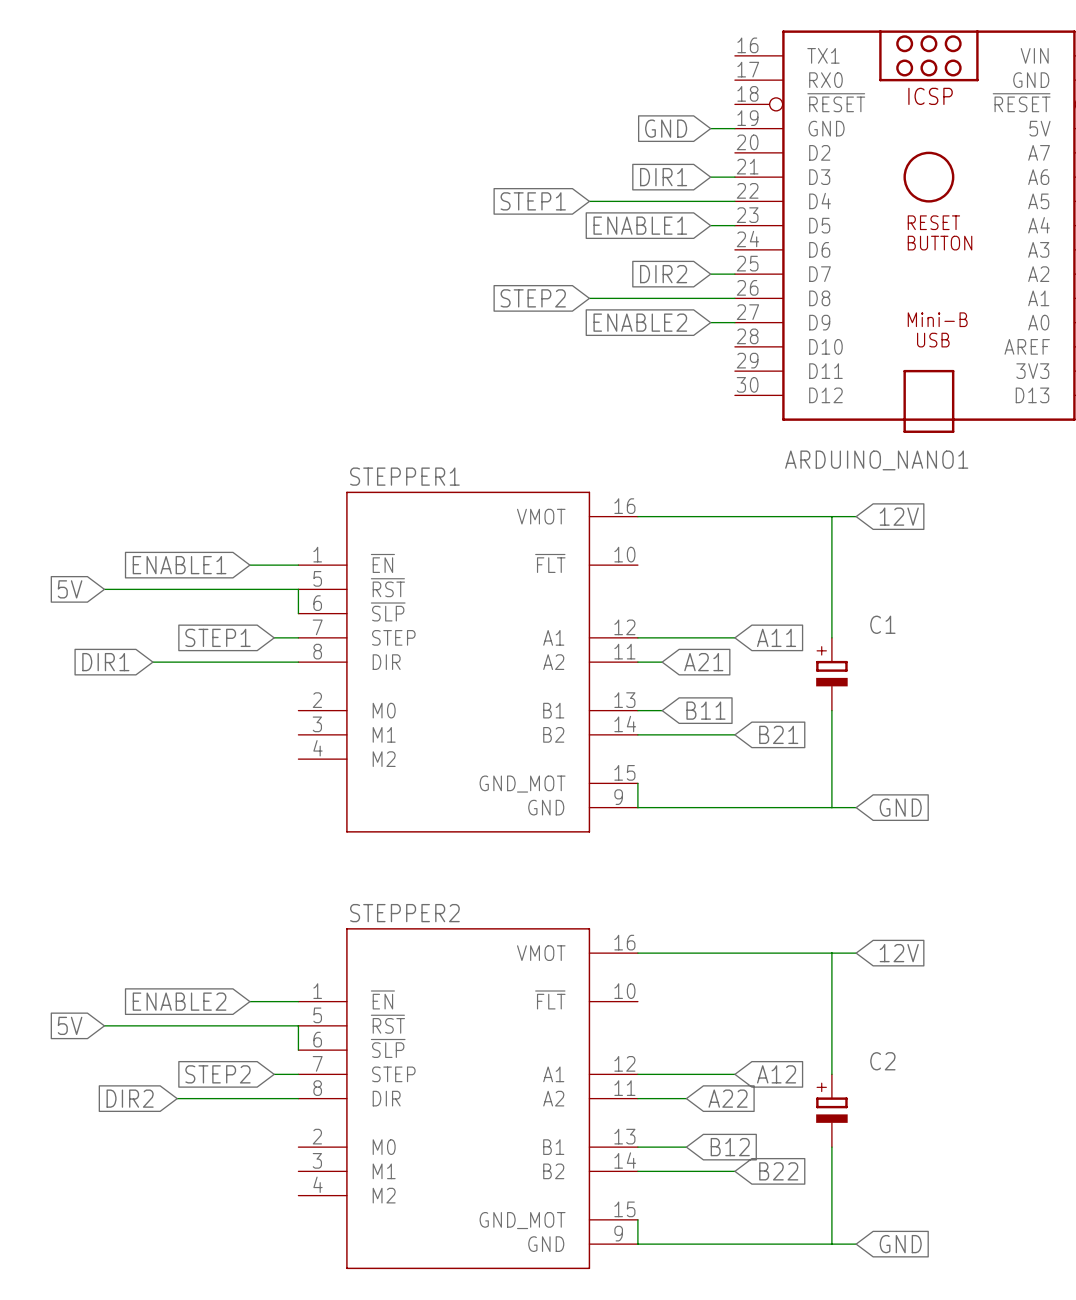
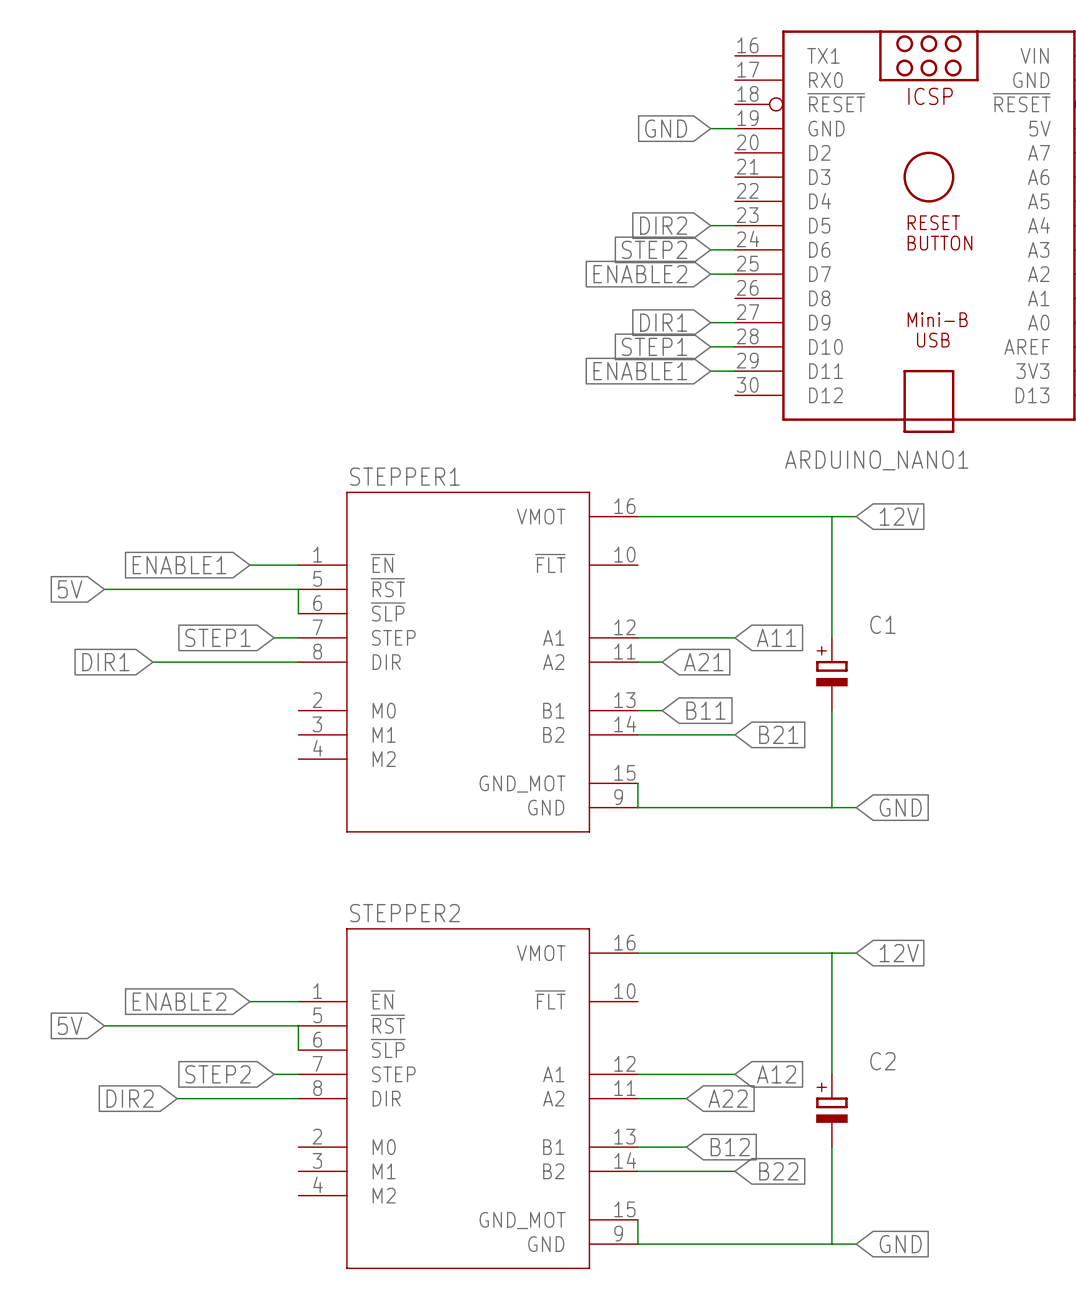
global label: DIR1 (663, 177) -> none
wire: (710, 177) (734, 177) -> (710, 249) (734, 249)
global label position: STEP1 (533, 201) -> STEP1 (654, 346)
wire: (589, 201) (734, 201) -> none
global label: ENABLE1 (640, 225) -> DIR2 (663, 225)
global label: DIR2 (663, 274) -> ENABLE2 (640, 274)
global label position: STEP2 (533, 298) -> STEP2 (654, 249)
wire: (589, 298) (734, 298) -> none
global label: ENABLE2 (640, 322) -> DIR1 (663, 322)
wire: none -> (710, 346) (734, 346)
global label: none -> ENABLE1 (640, 371)
wire: none -> (710, 371) (734, 371)

